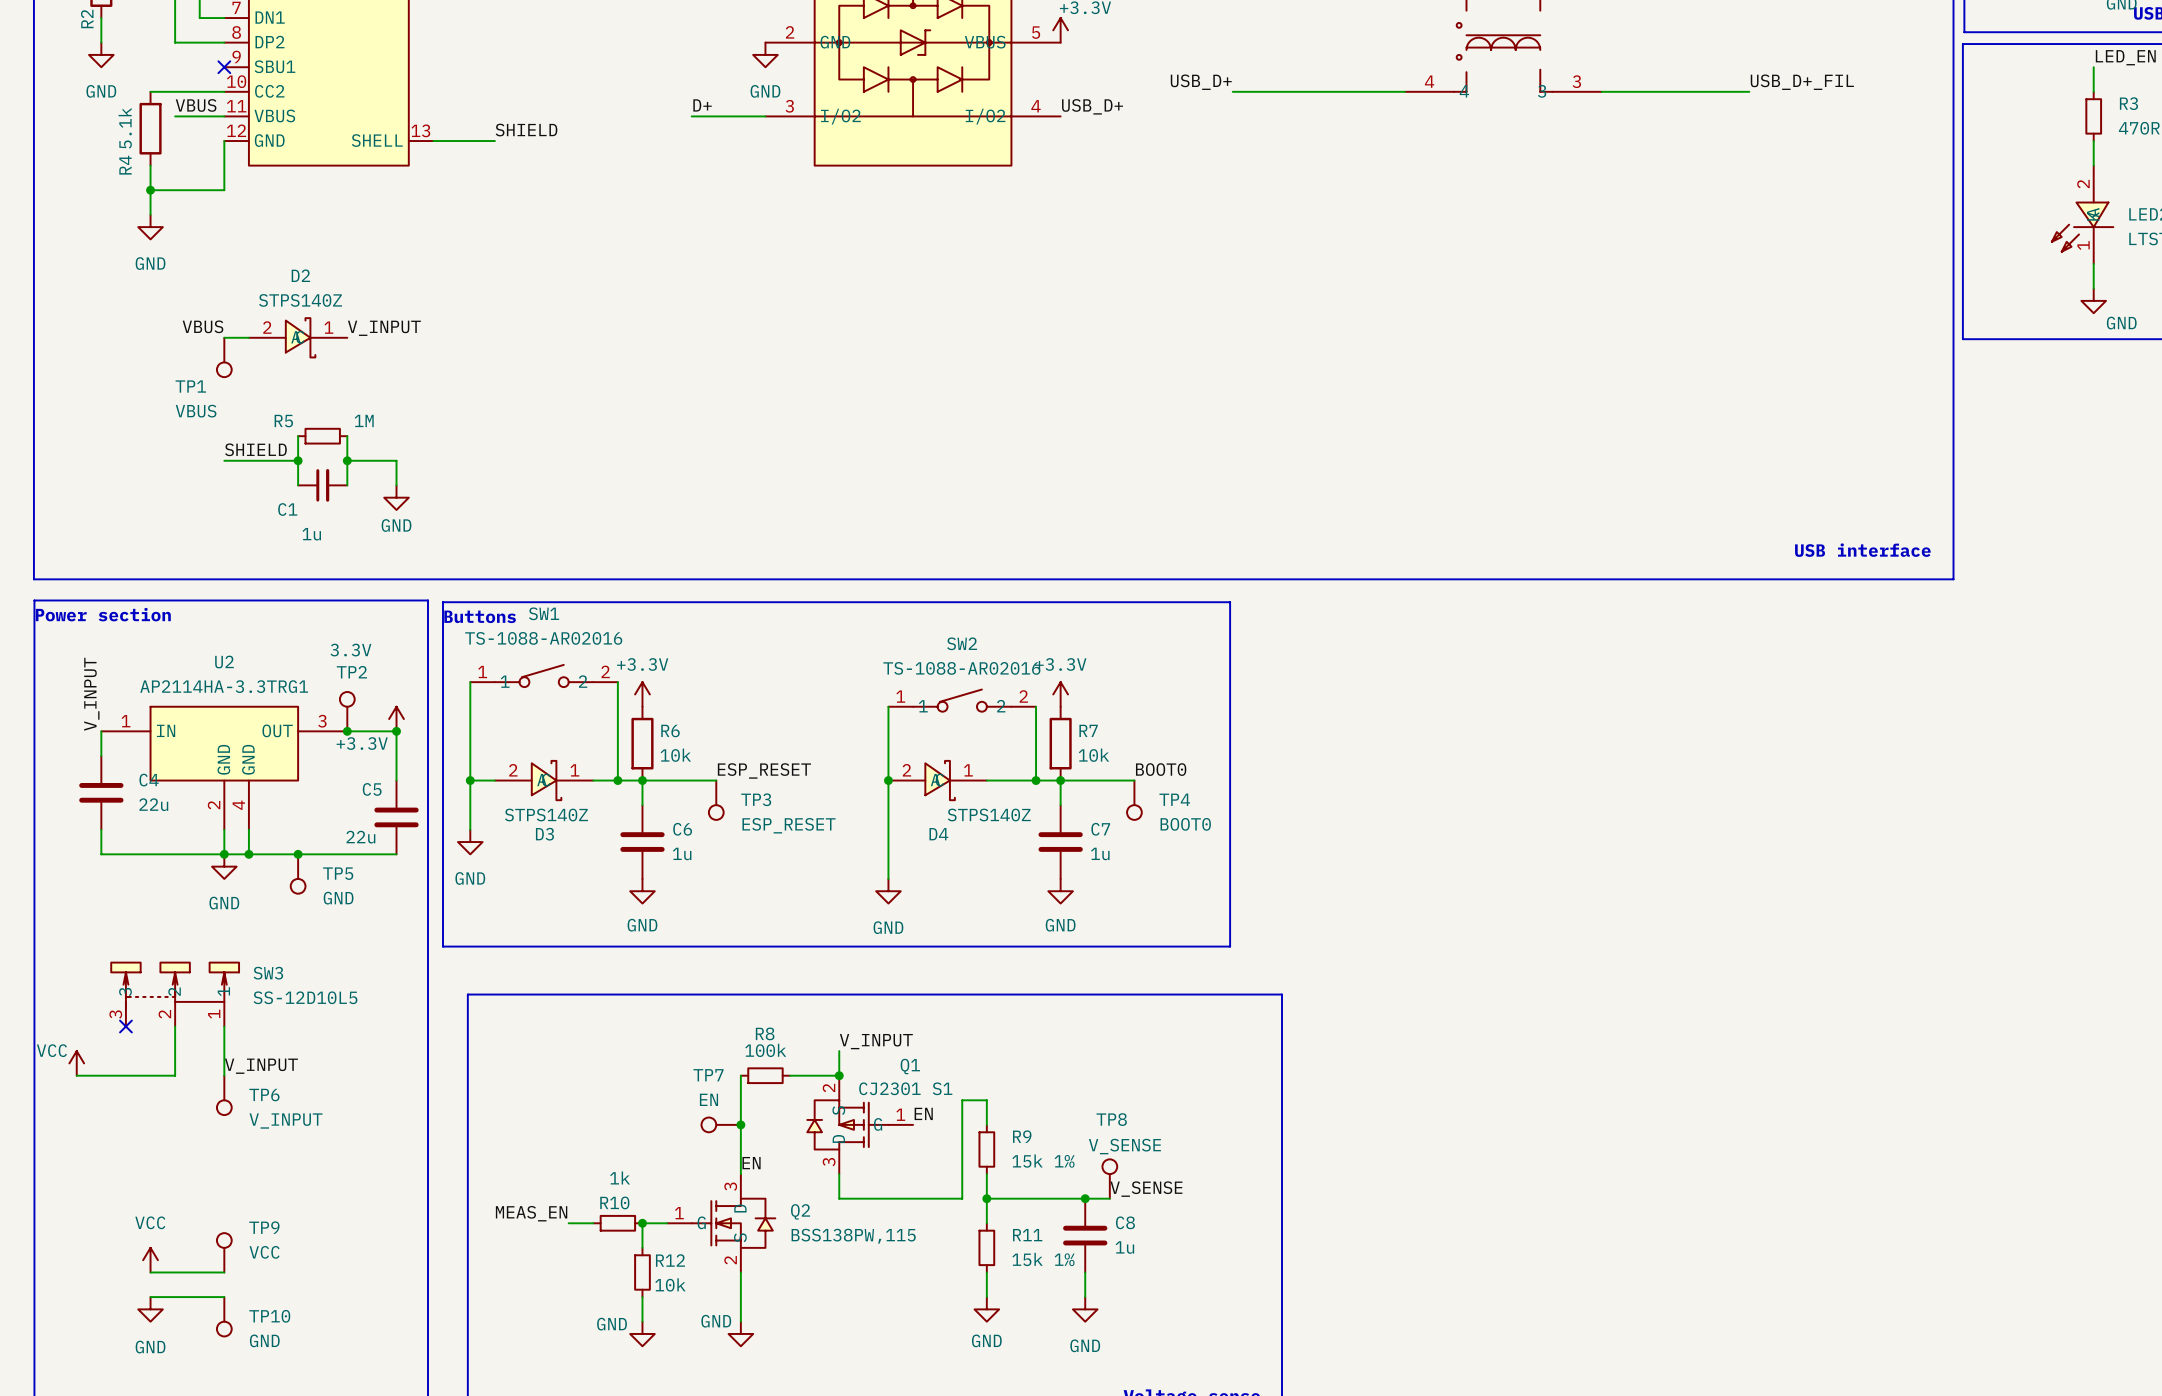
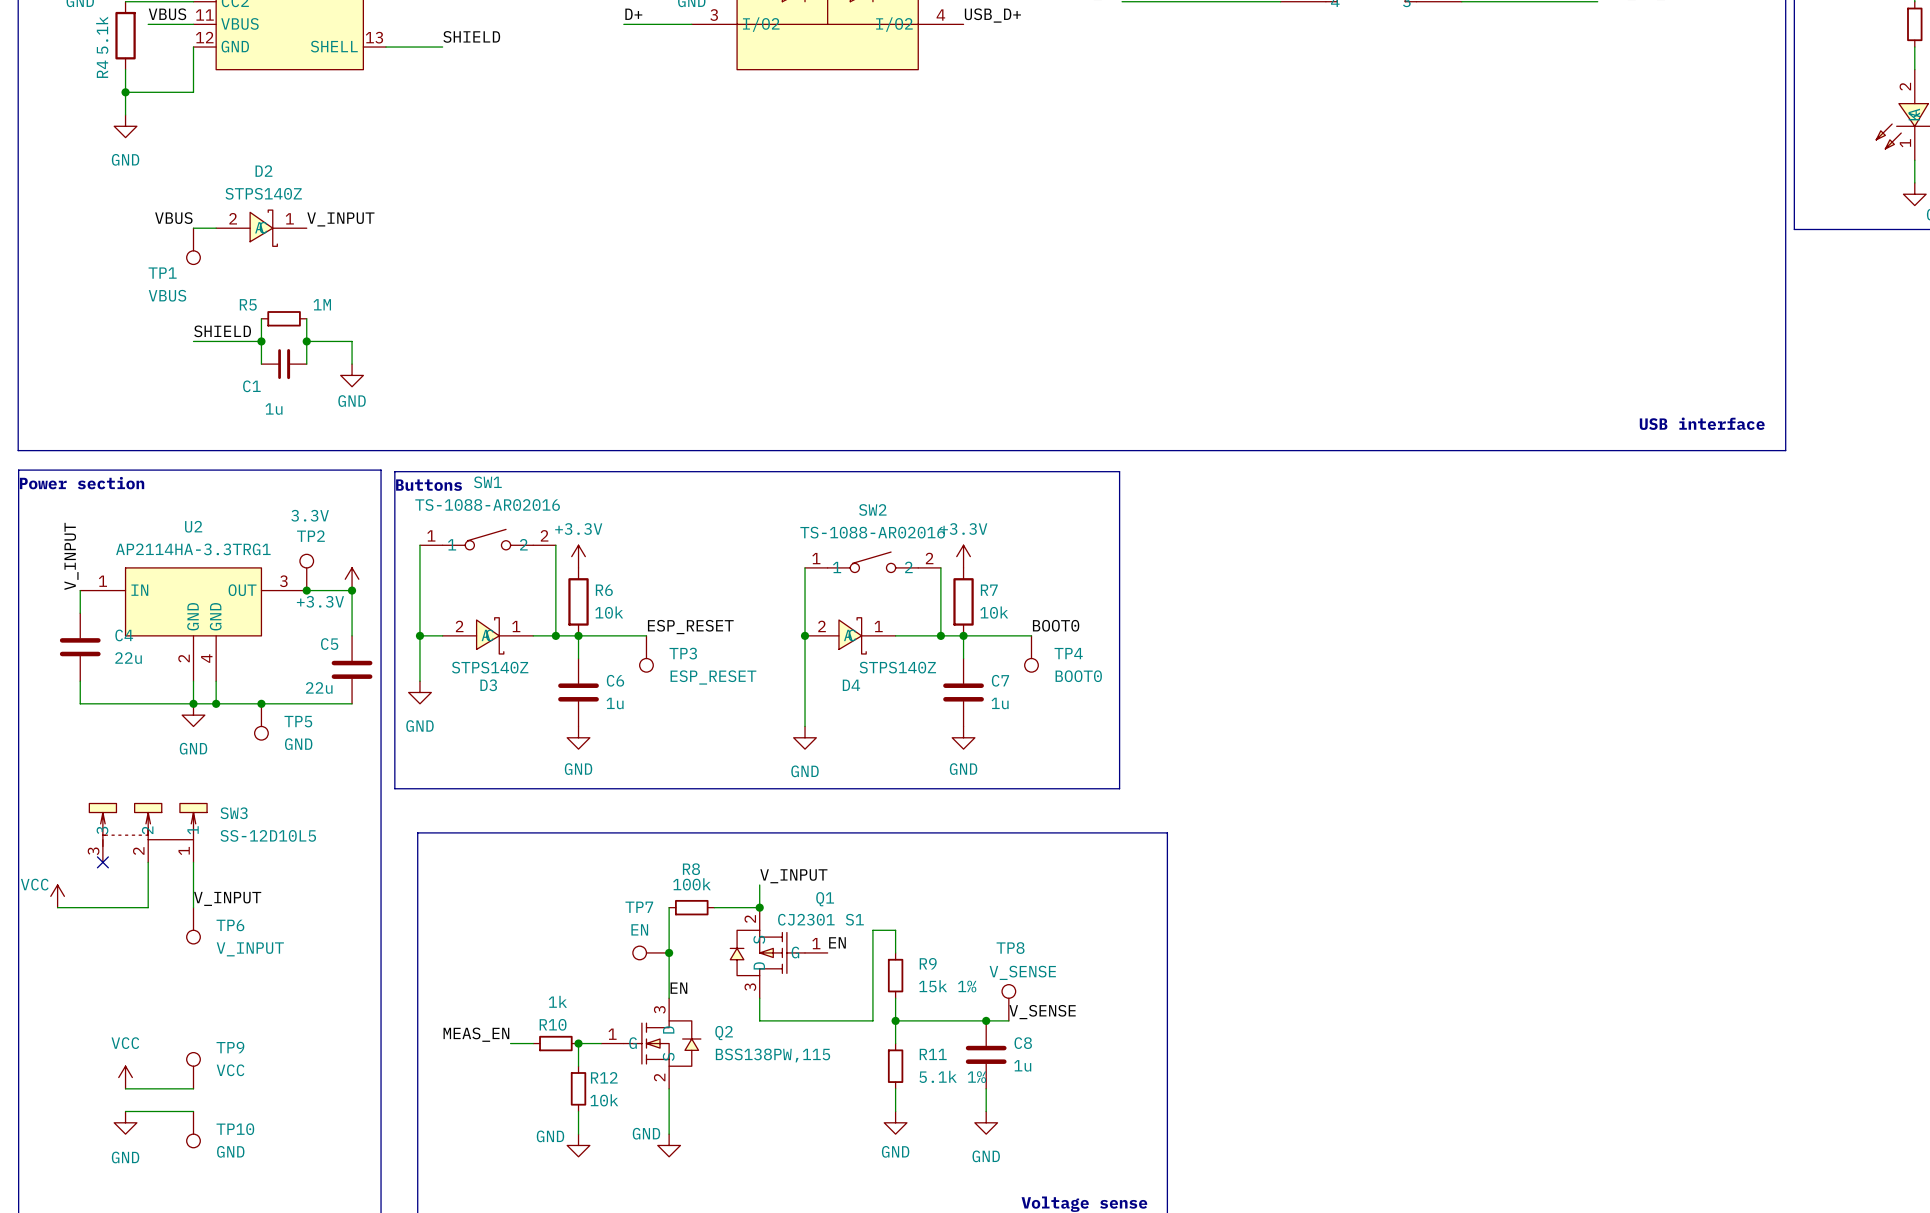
R11 value: 15k 1% (1043, 1259) -> 5.1k 1% (952, 1076)

